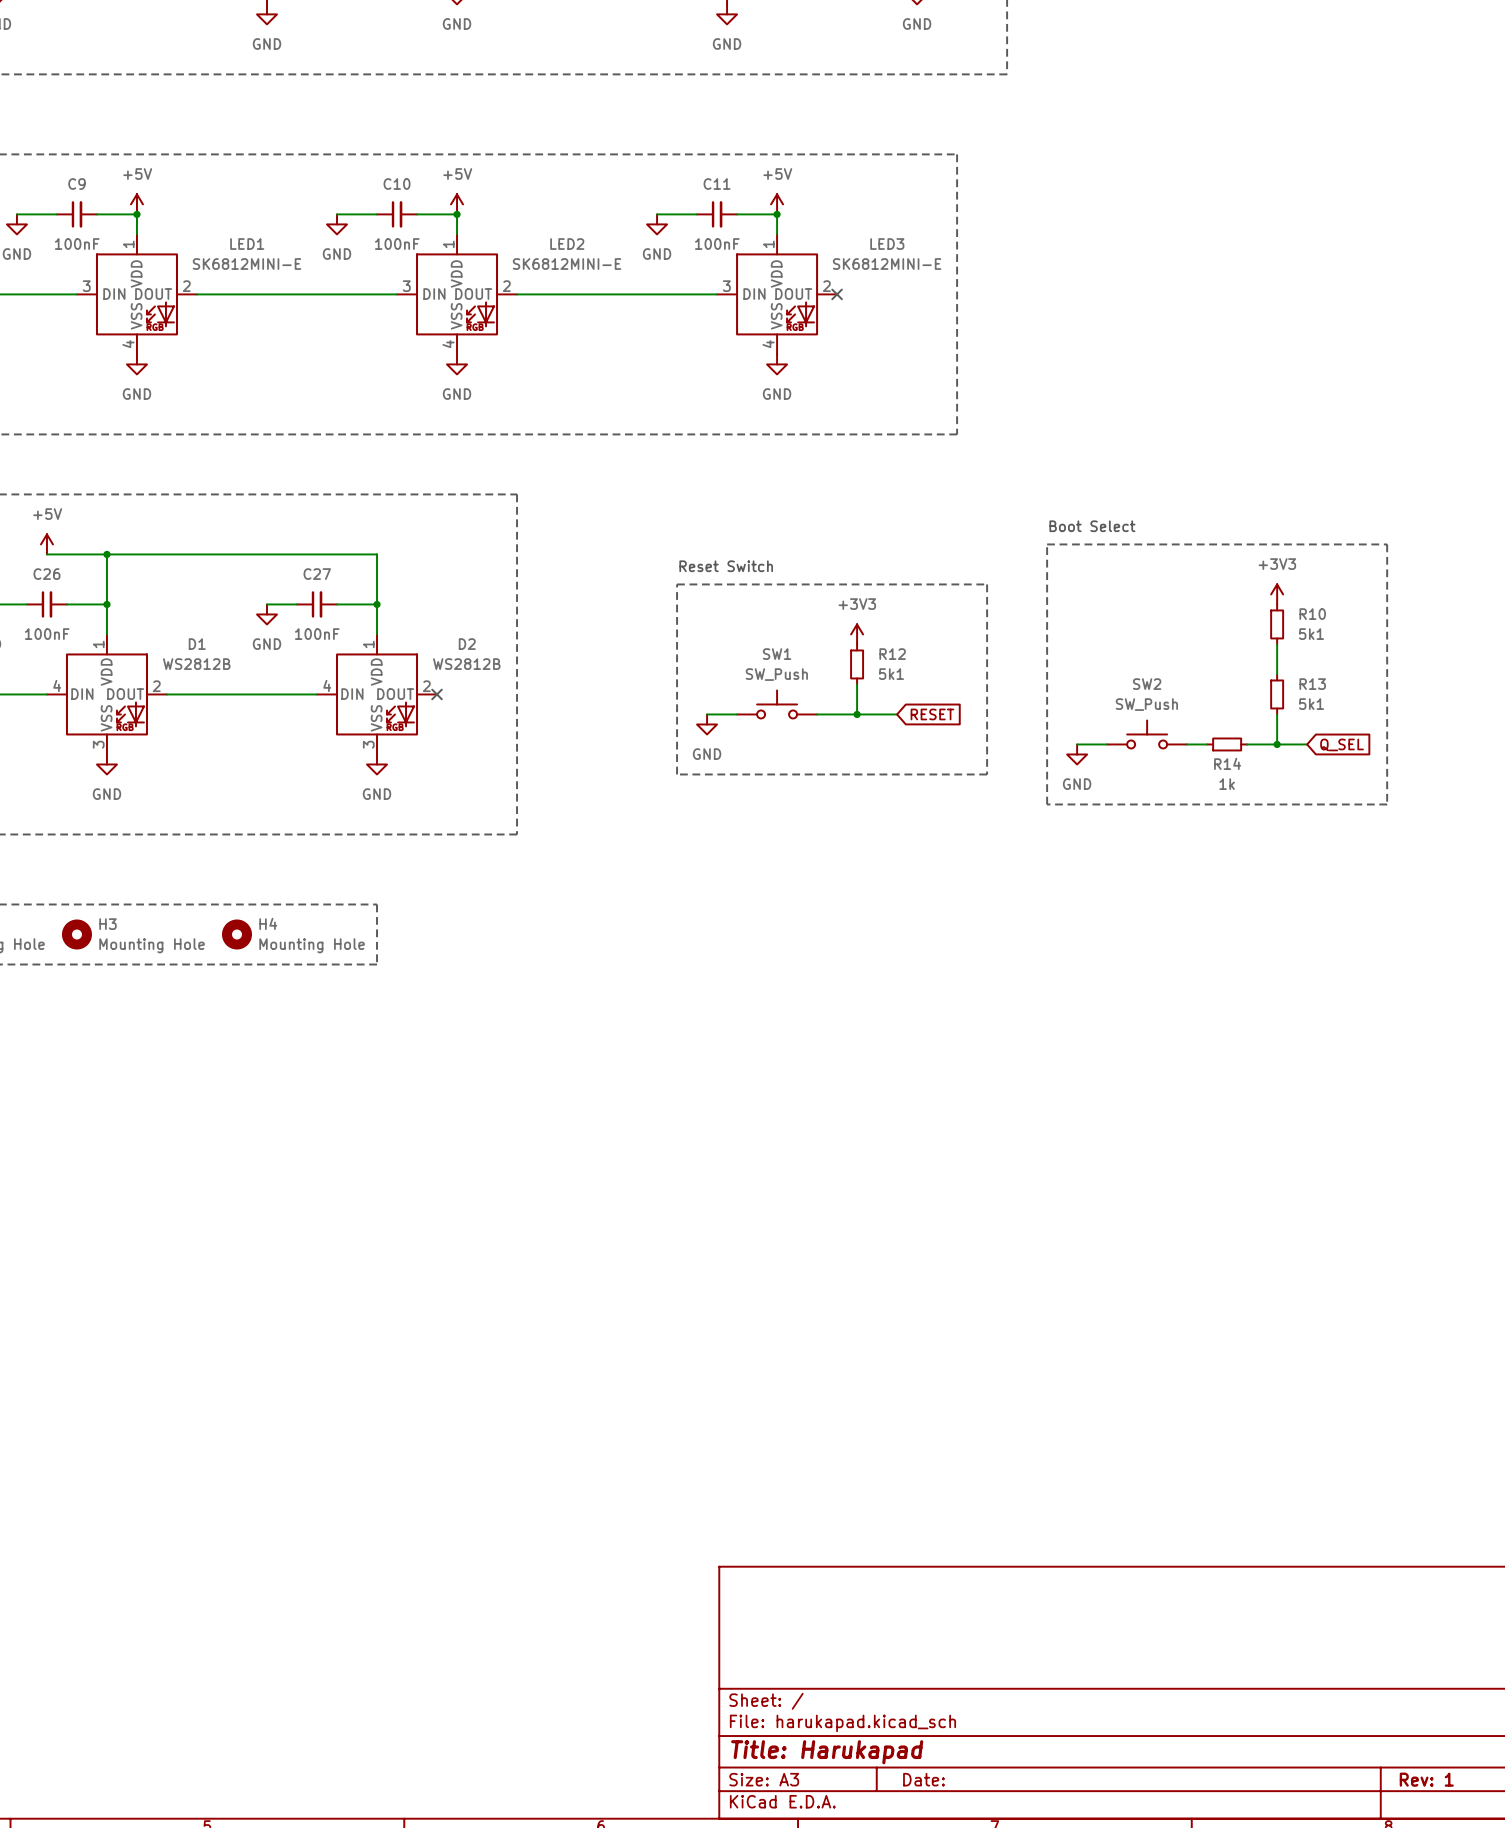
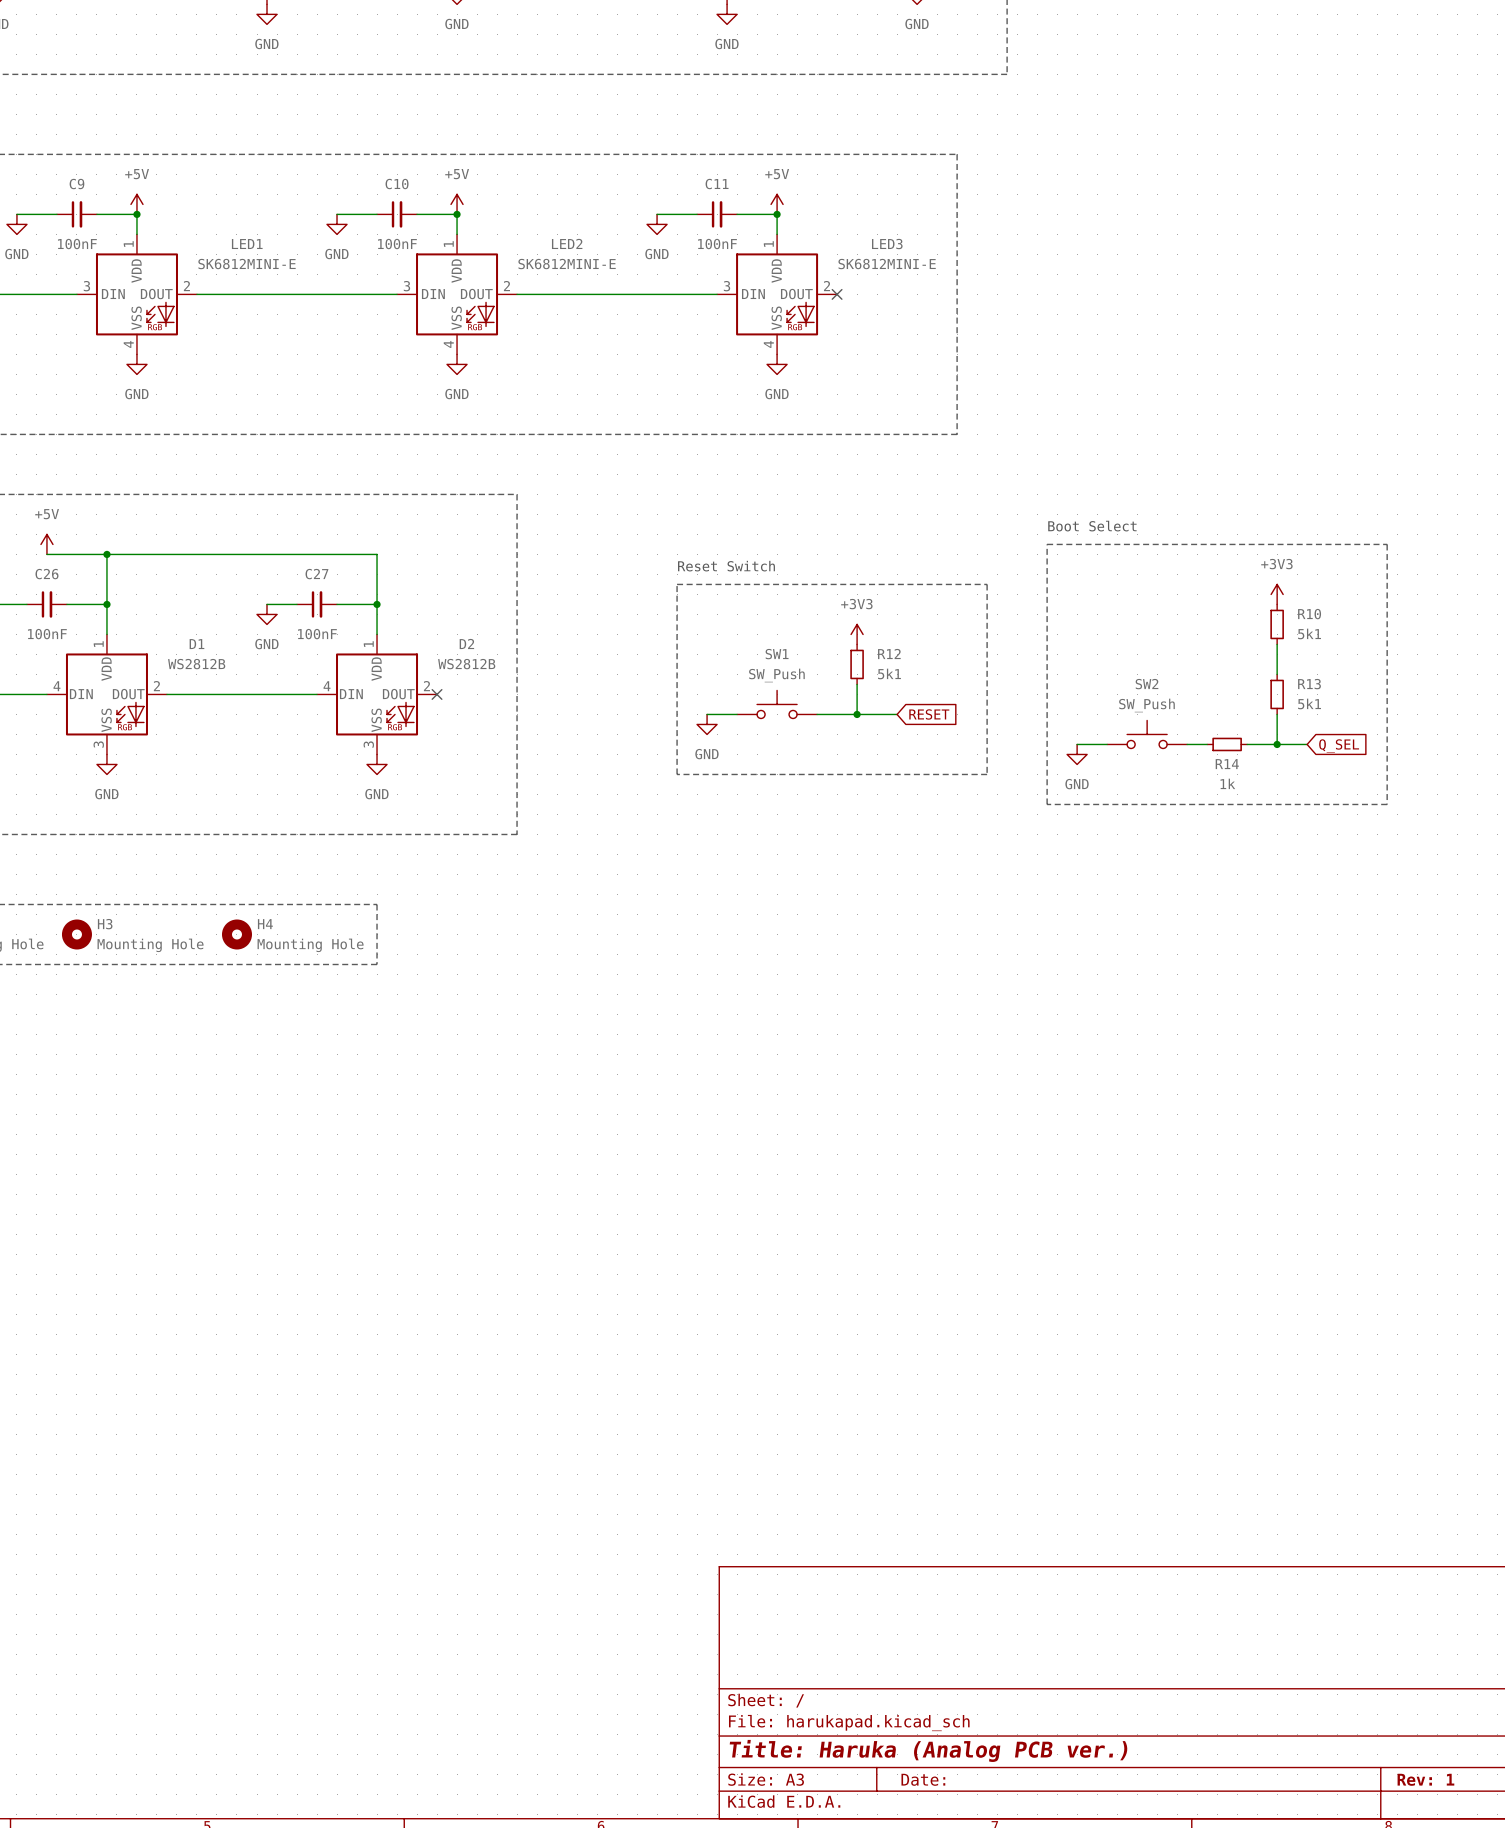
title block: Title: Harukapad (827, 1752) -> Title: Haruka (Analog PCB ver.) (928, 1750)

